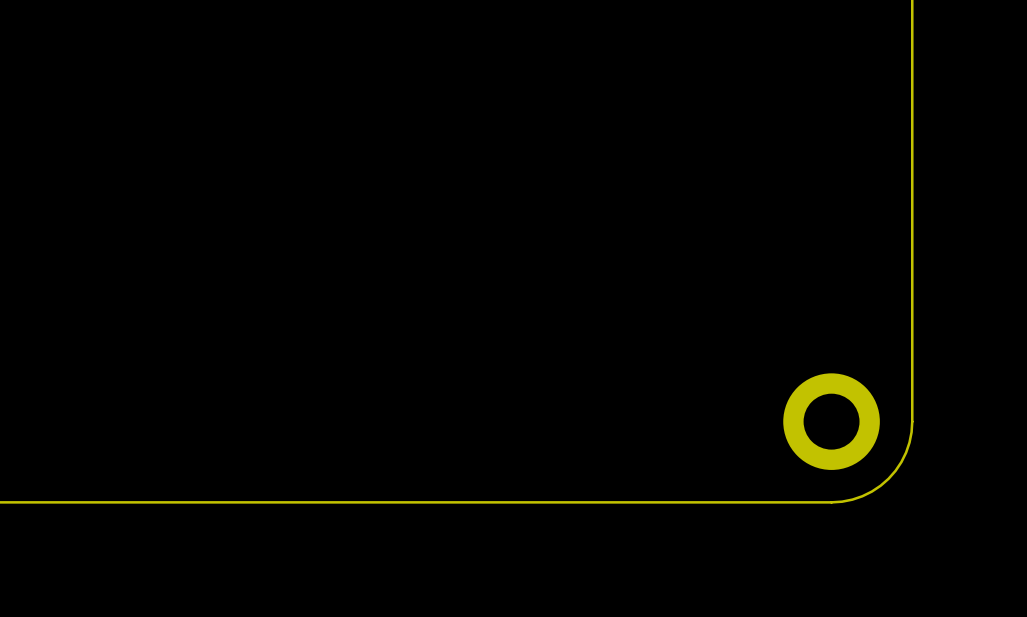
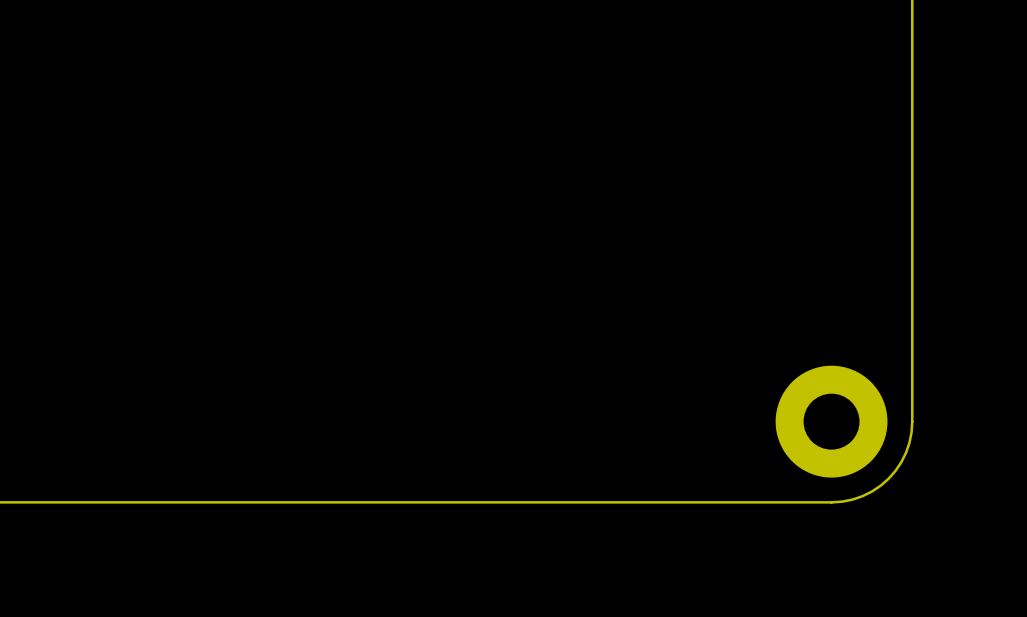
part footprint: [783, 373, 880, 470] -> [775, 365, 888, 478]

